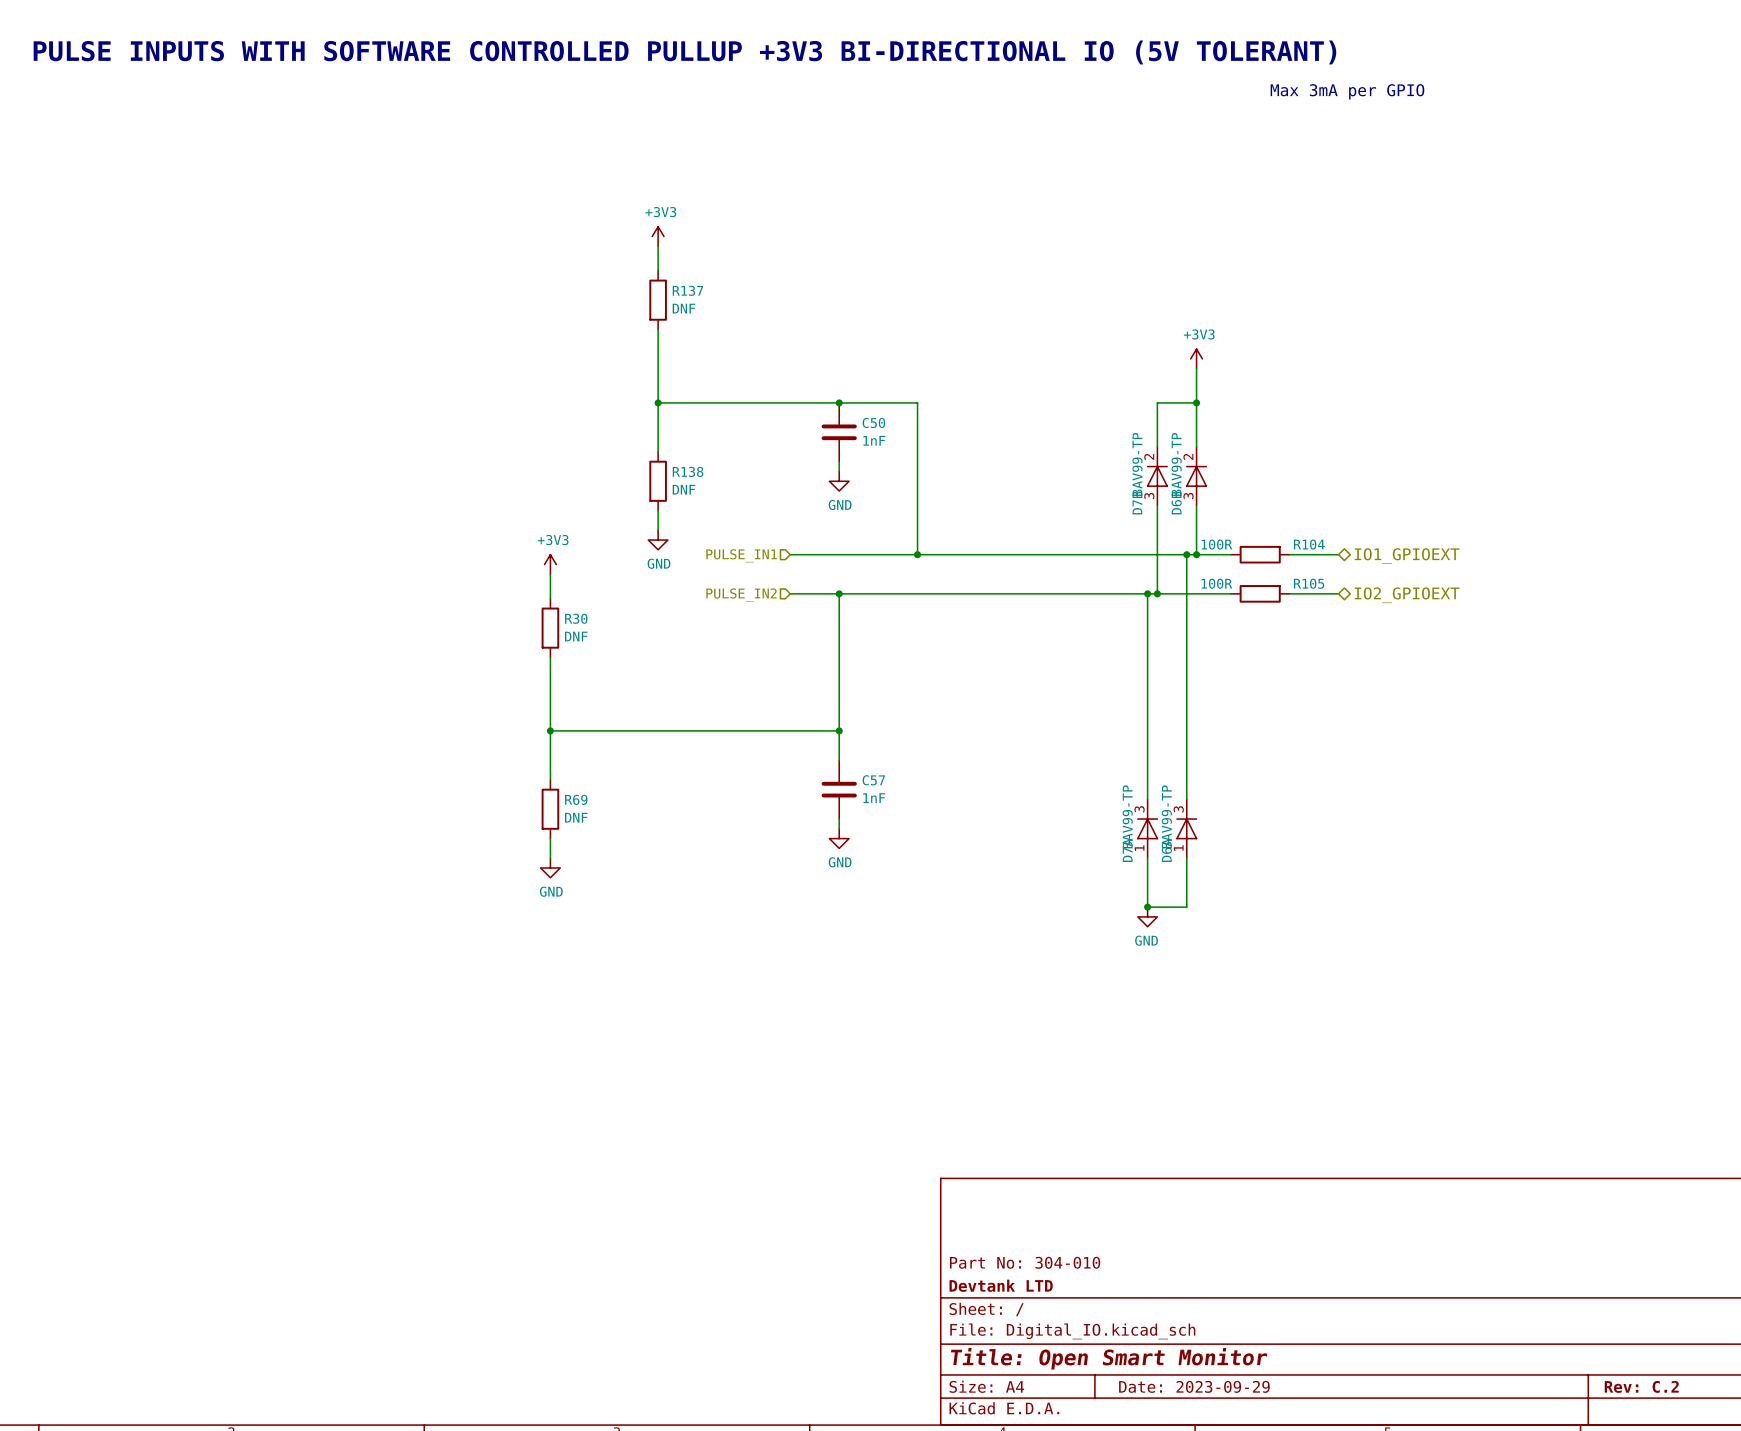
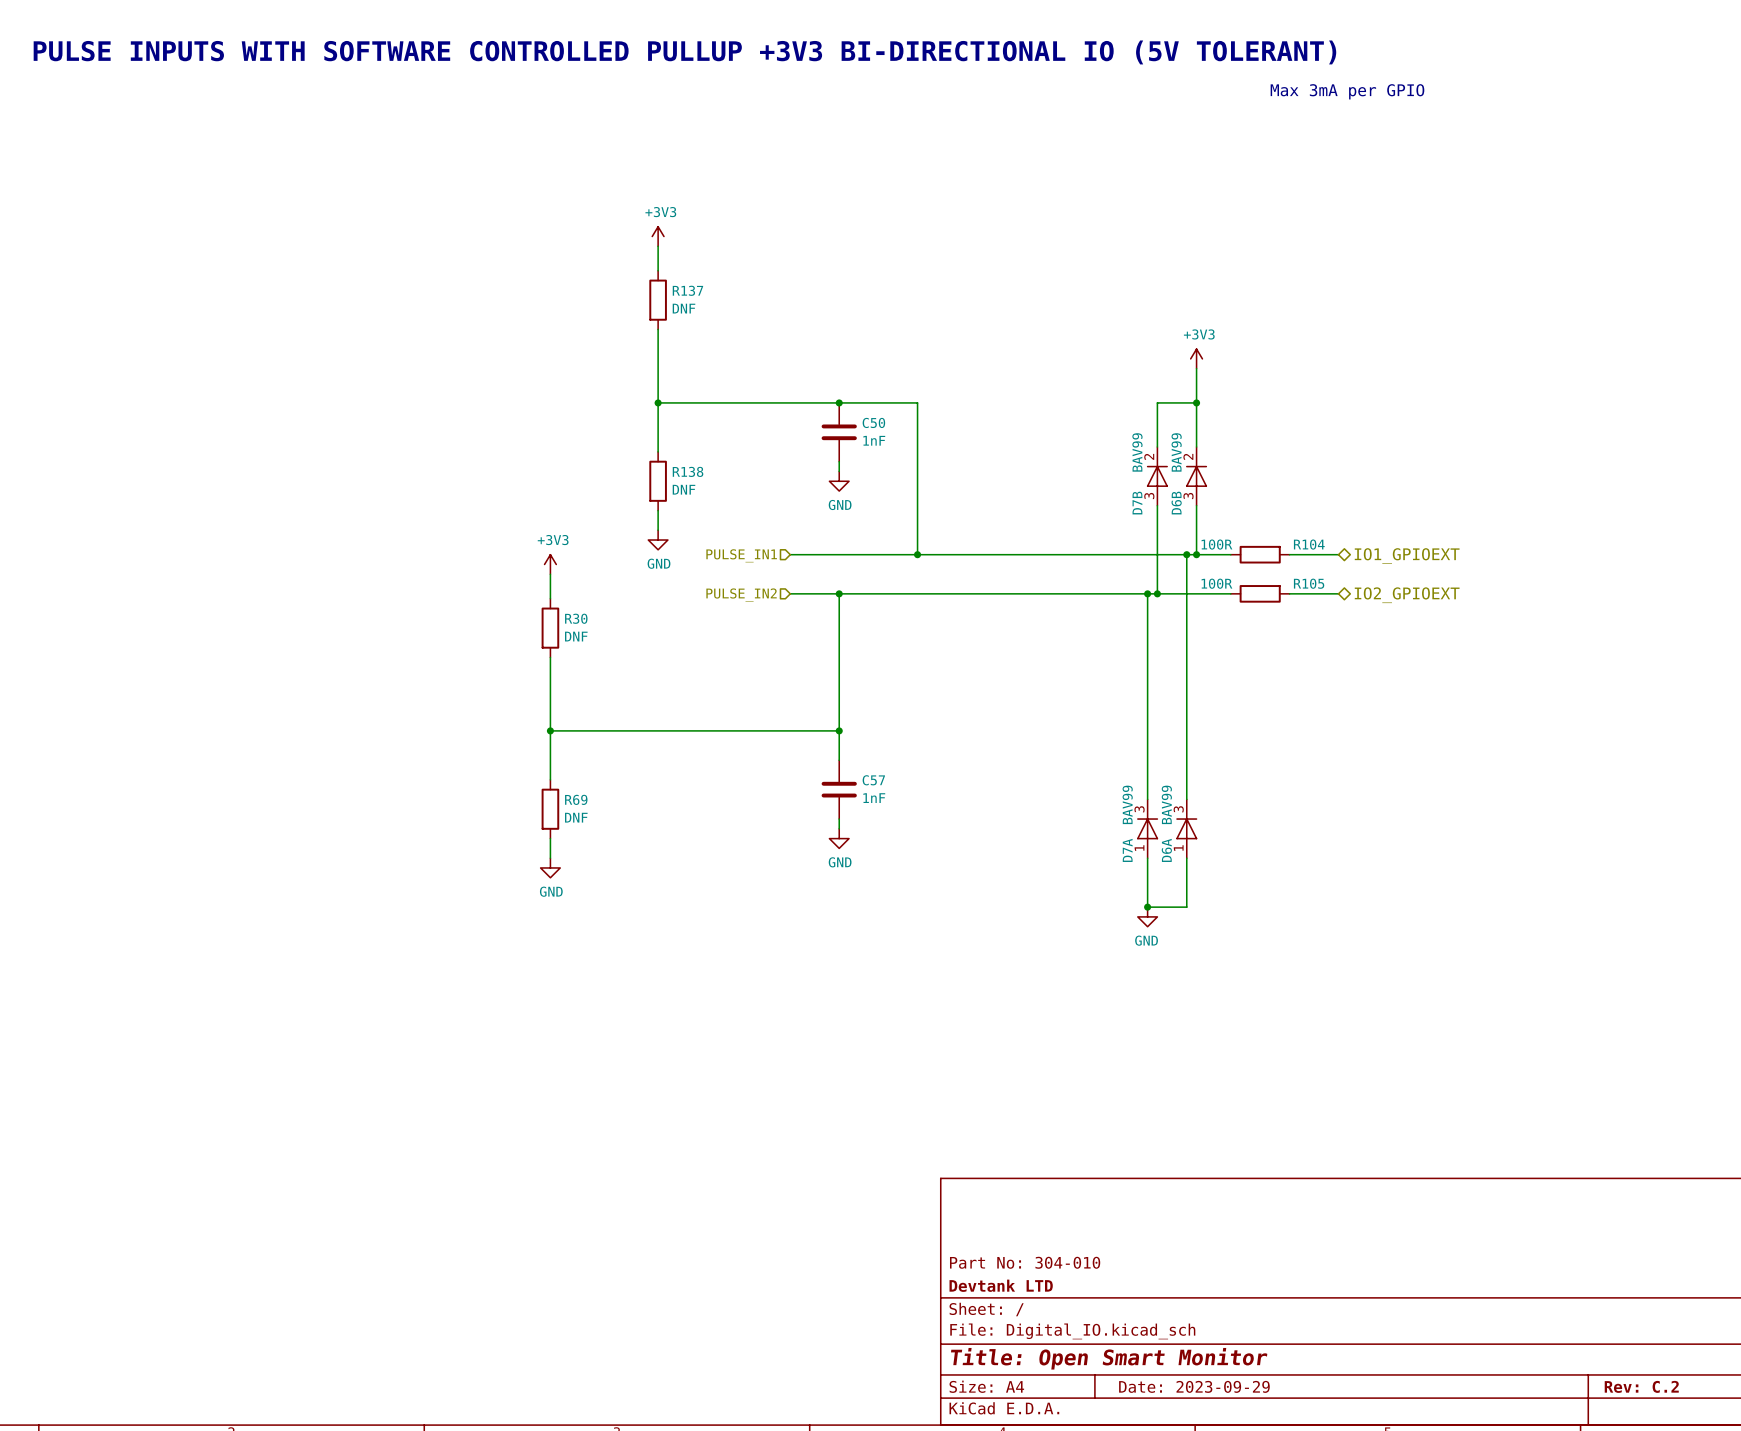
D7B value: BAV99-TP (1137, 464) -> BAV99 (1137, 452)
D6B value: BAV99-TP (1176, 464) -> BAV99 (1176, 452)
D7A value: BAV99-TP (1127, 816) -> BAV99 (1127, 804)
D6A value: BAV99-TP (1166, 816) -> BAV99 (1166, 804)

